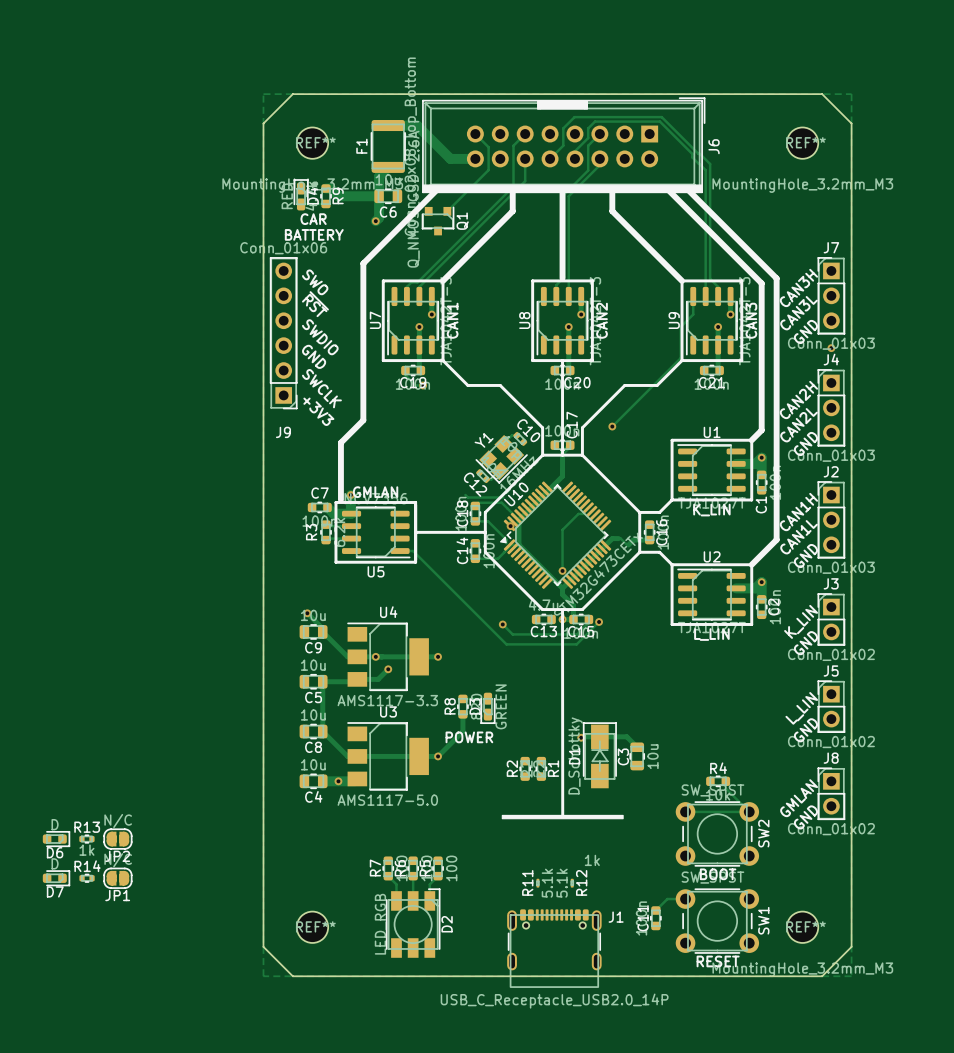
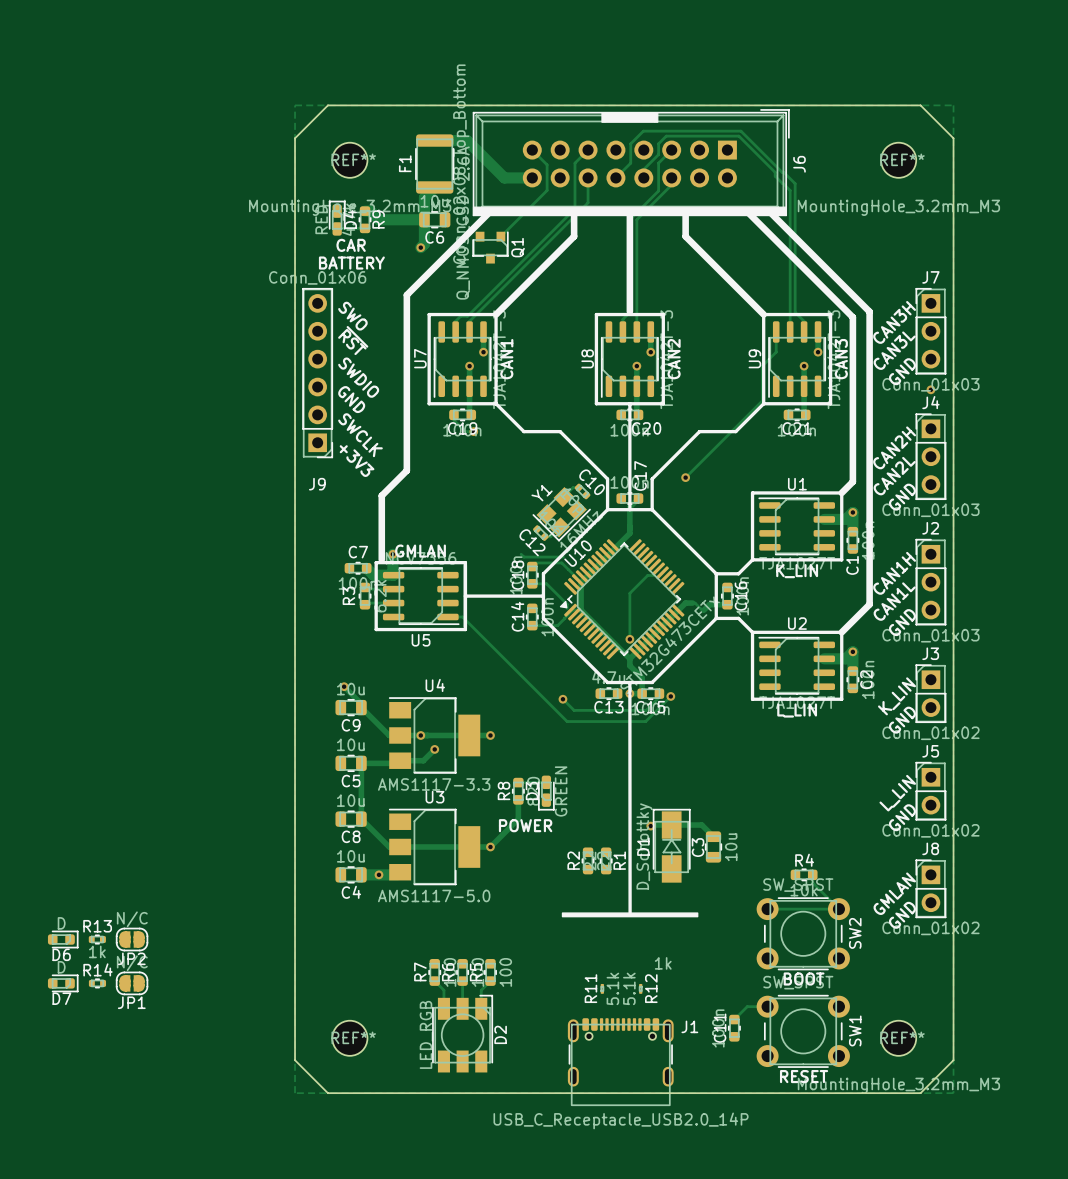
via: (510, 526) -> none

